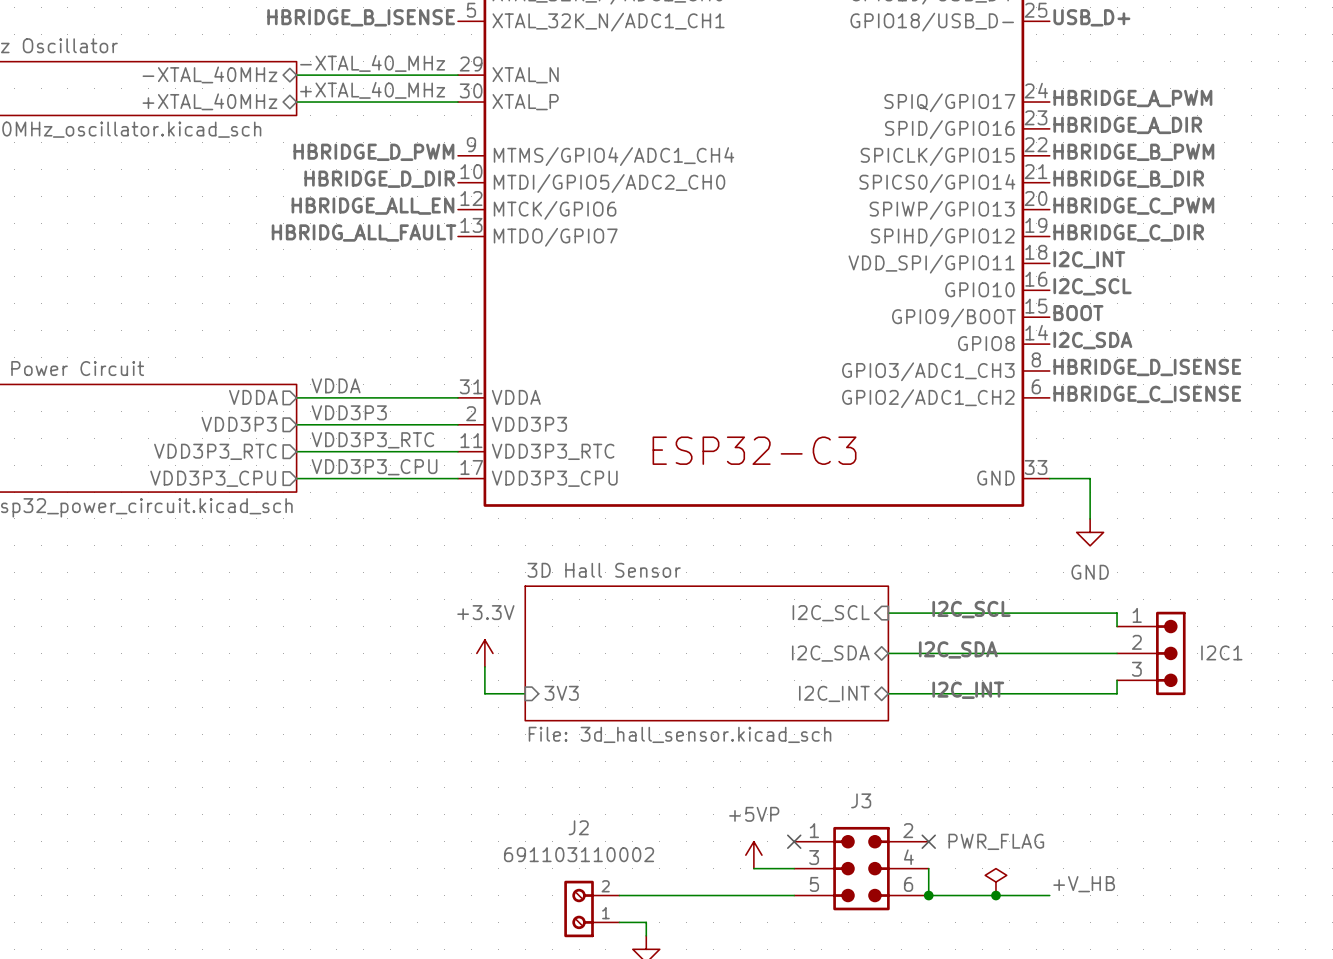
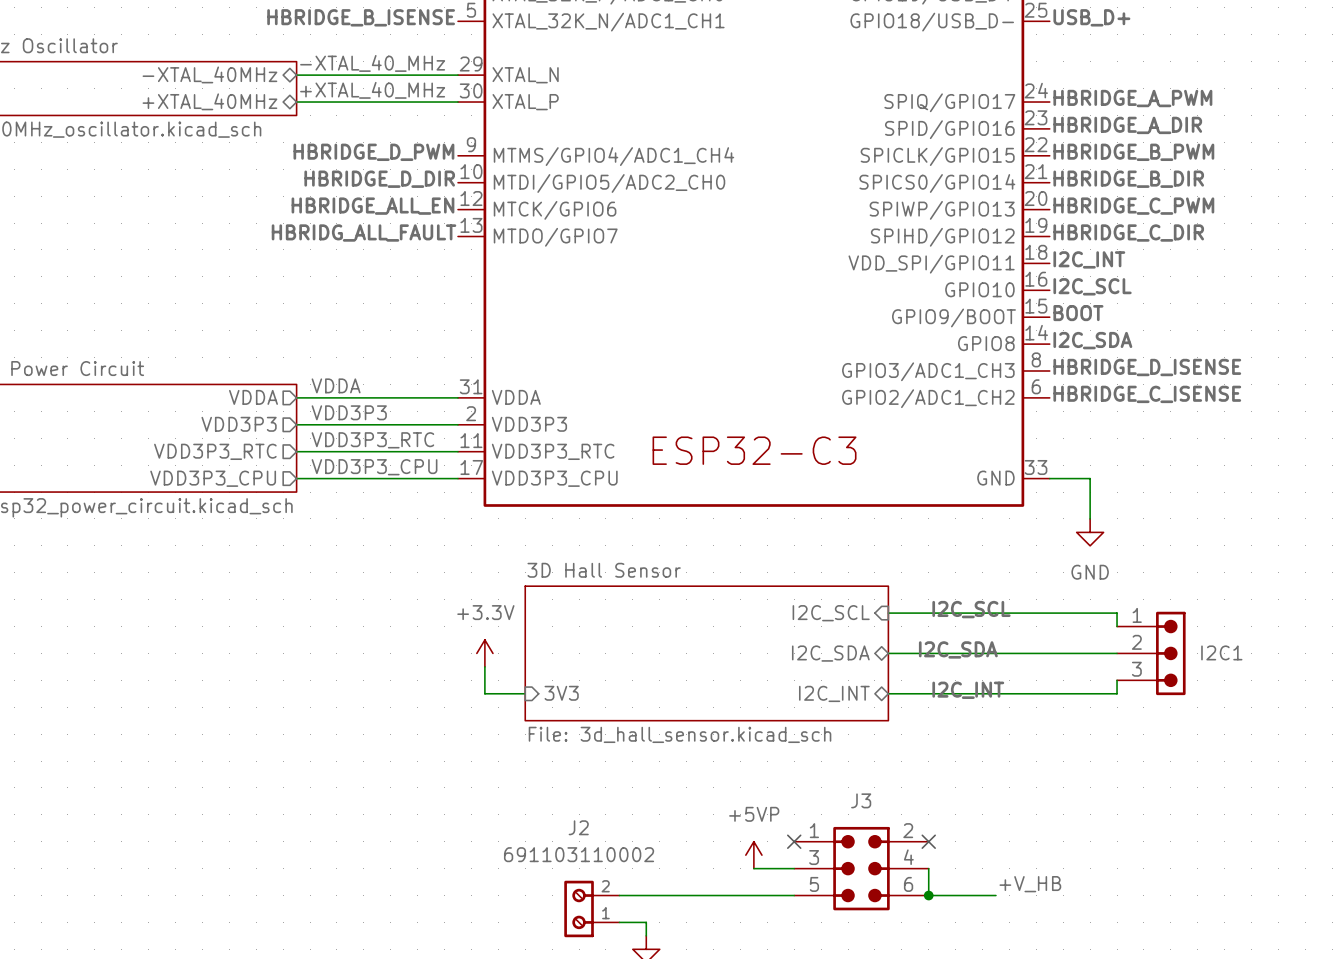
power symbol: PWR_FLAG (995, 882) -> none
label position: +V_HB (1084, 884) -> +V_HB (1030, 884)
wire: (995, 895) (1049, 895) -> none
junction: (995, 895) -> none

